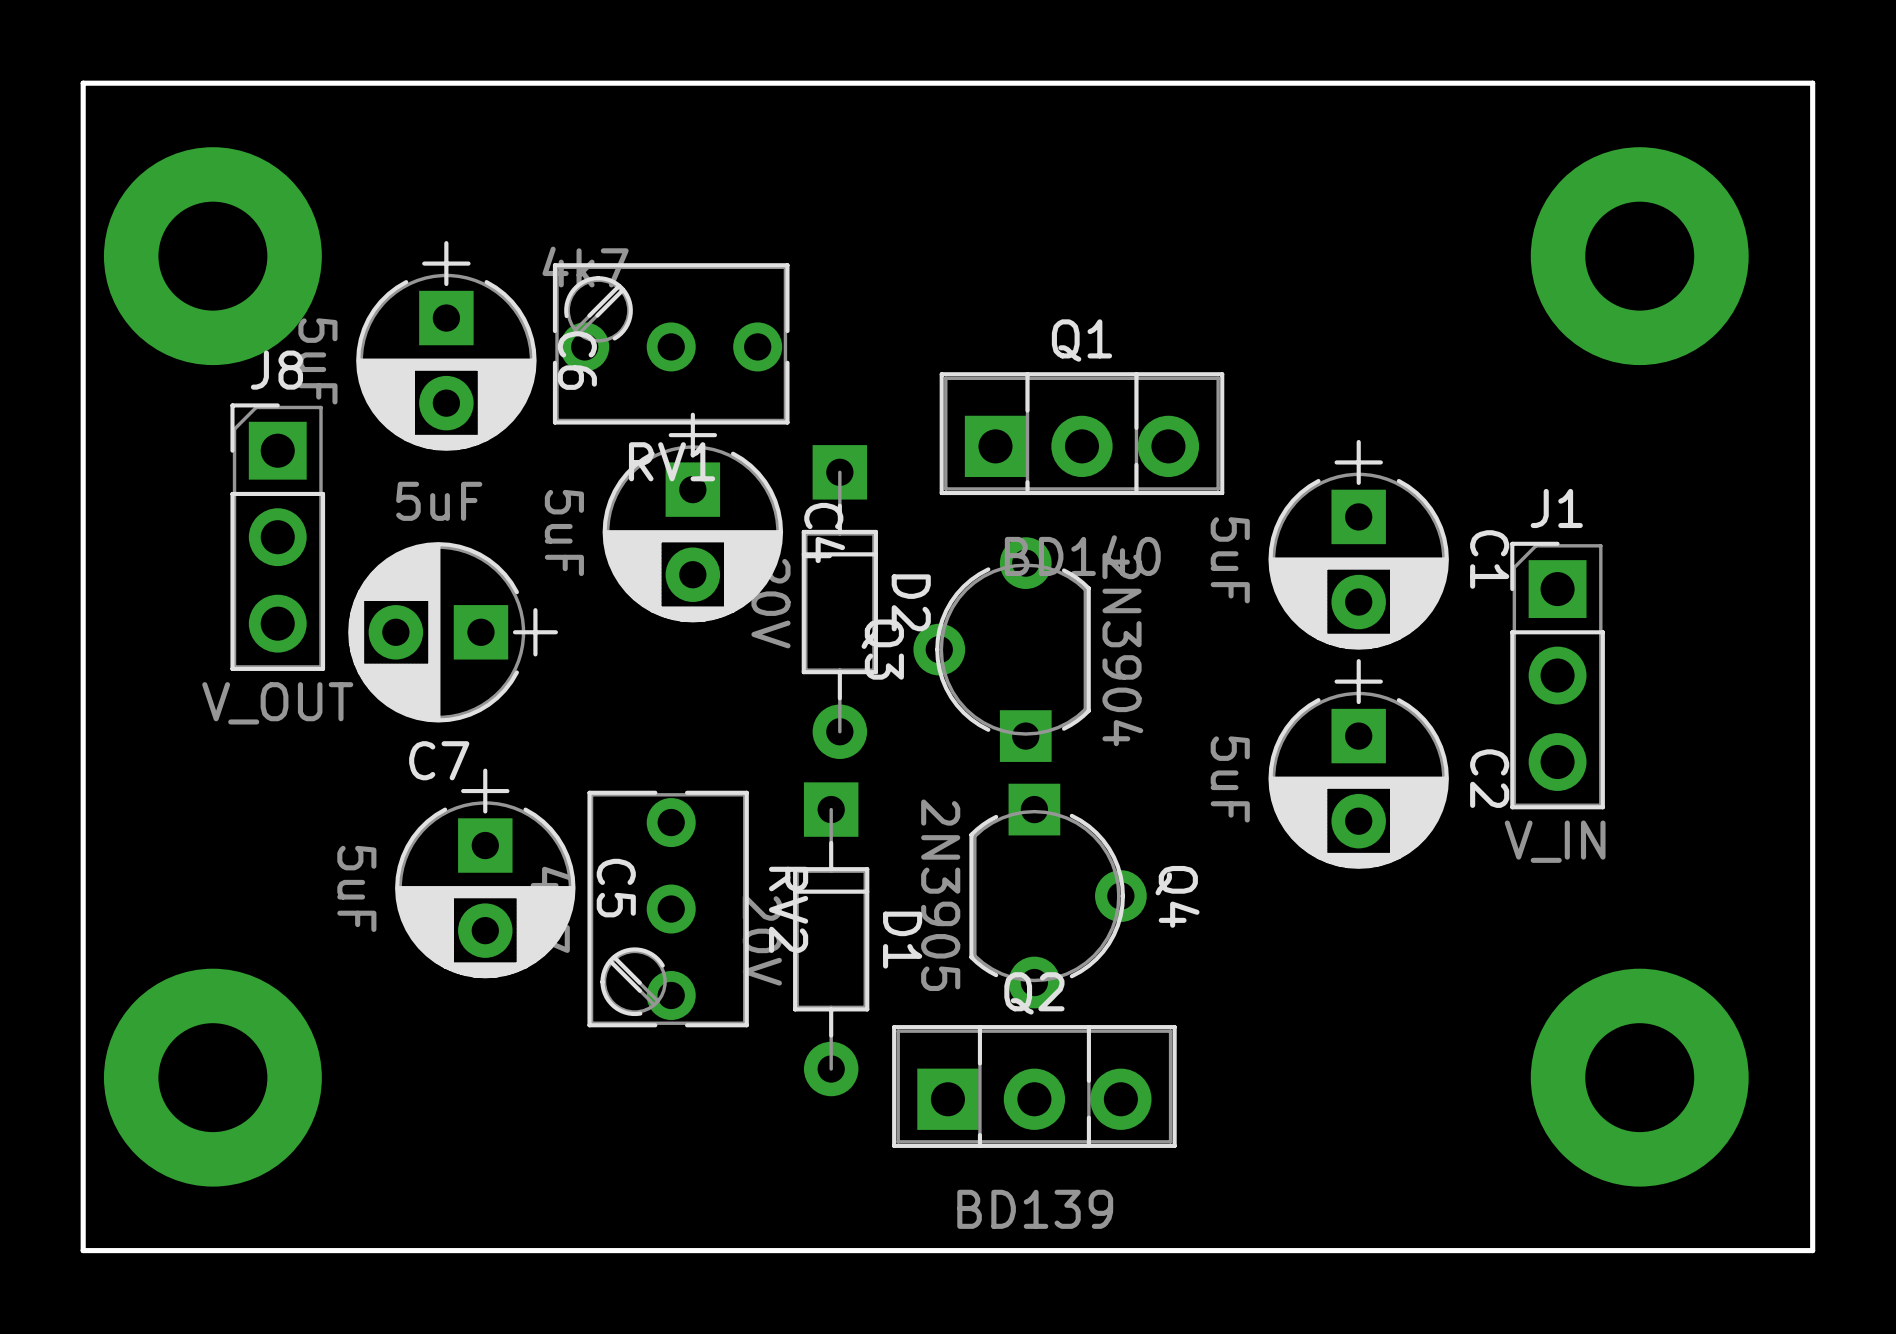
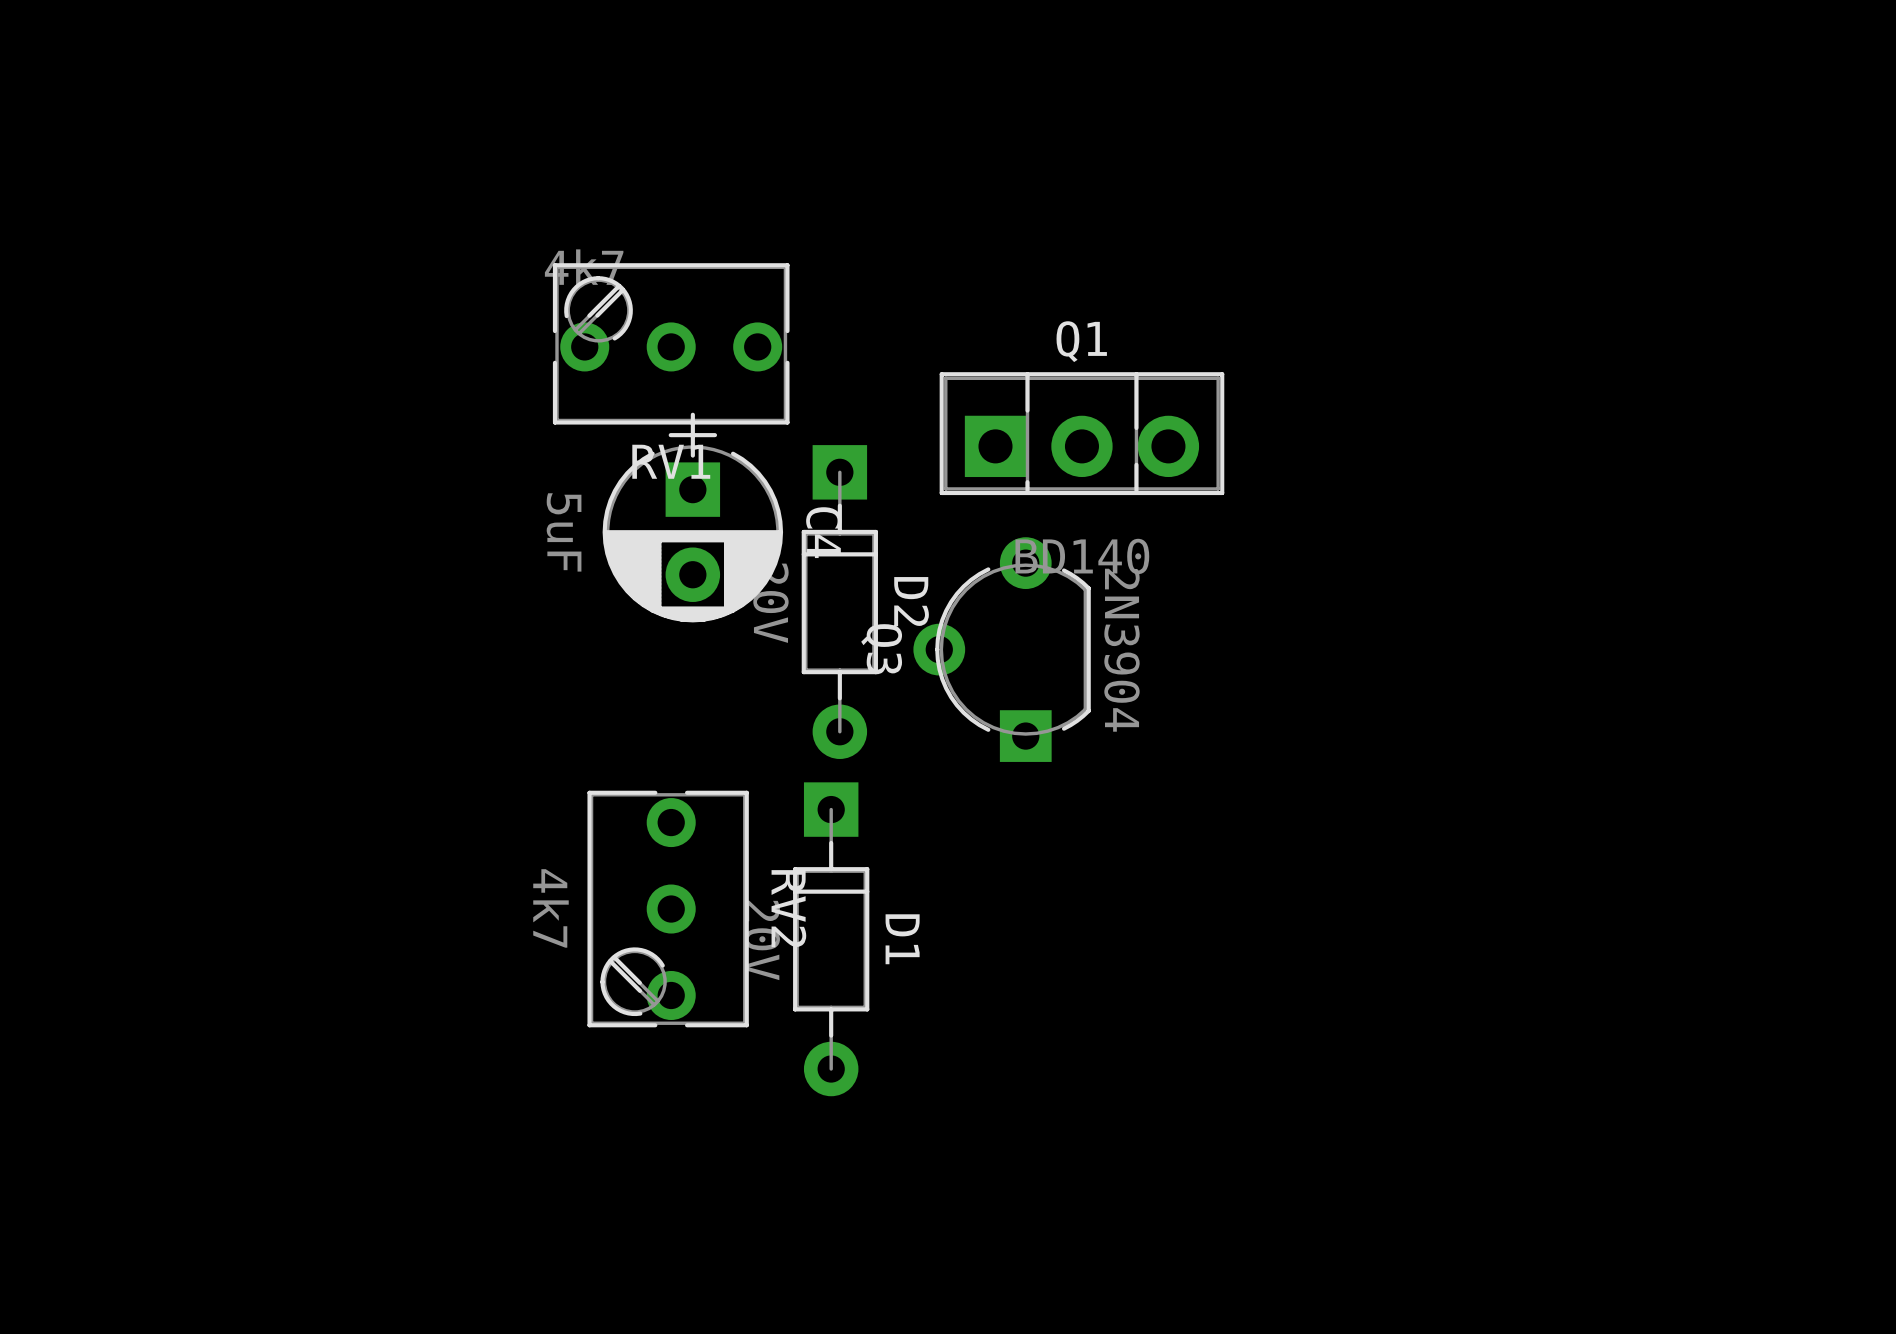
board edge: (1812, 83) (83, 83) (83, 1250) (1812, 1250) (1812, 83) -> none
part: (212, 256) -> none
part: (1639, 256) -> none
C6: 5uF (446, 345) -> none
J8: V_OUT (277, 537) -> none
C1: 5uF (1358, 544) -> none
C7: 5uF (453, 632) -> none
J1: V_IN (1557, 675) -> none
C2: 5uF (1358, 763) -> none
C5: 5uF (485, 873) -> none
Q4: 2N3905 (1058, 896) -> none
part: (212, 1077) -> none
part: (1639, 1077) -> none
Q2: BD139 (1034, 1086) -> none

